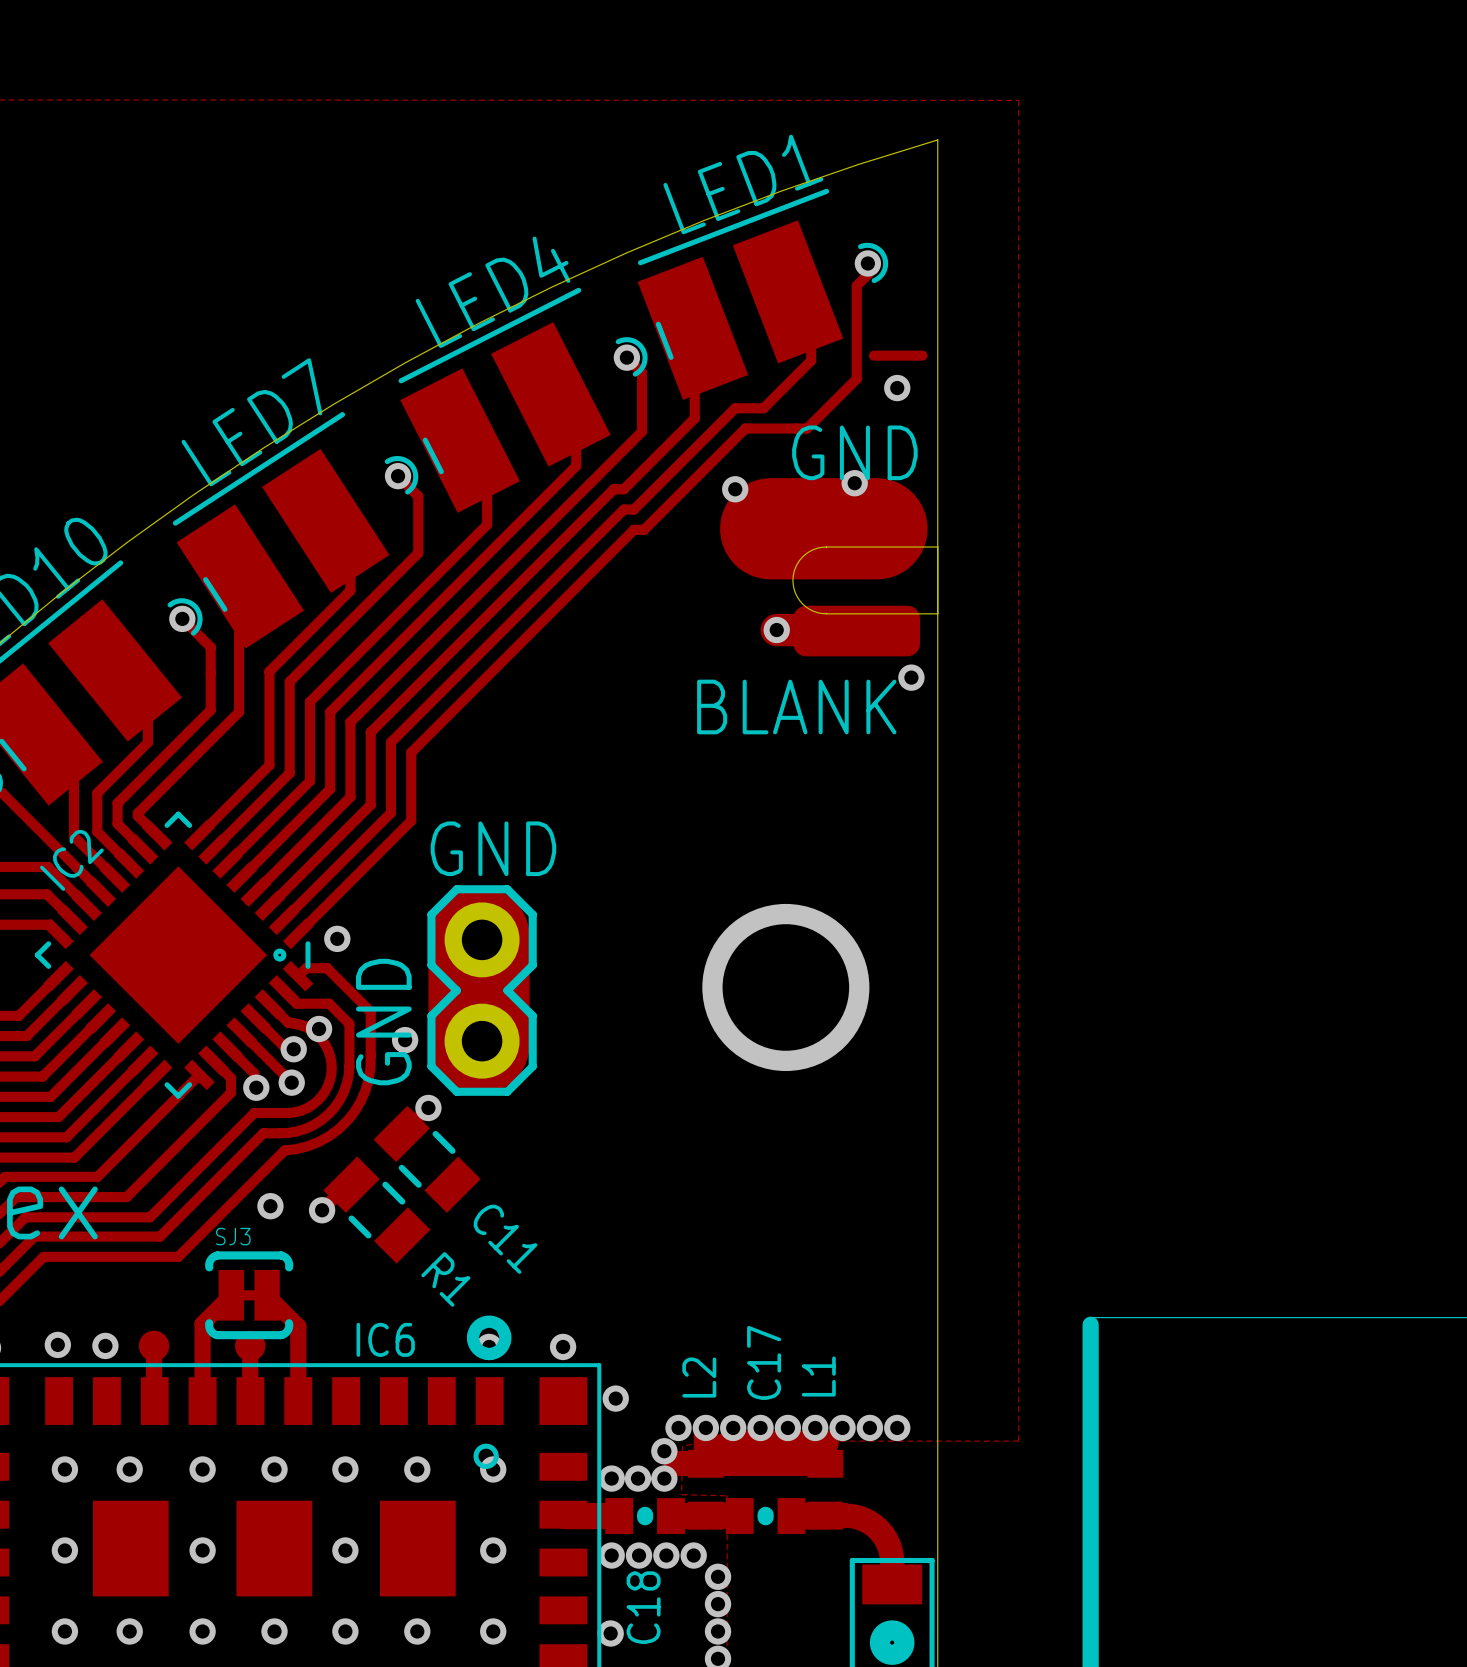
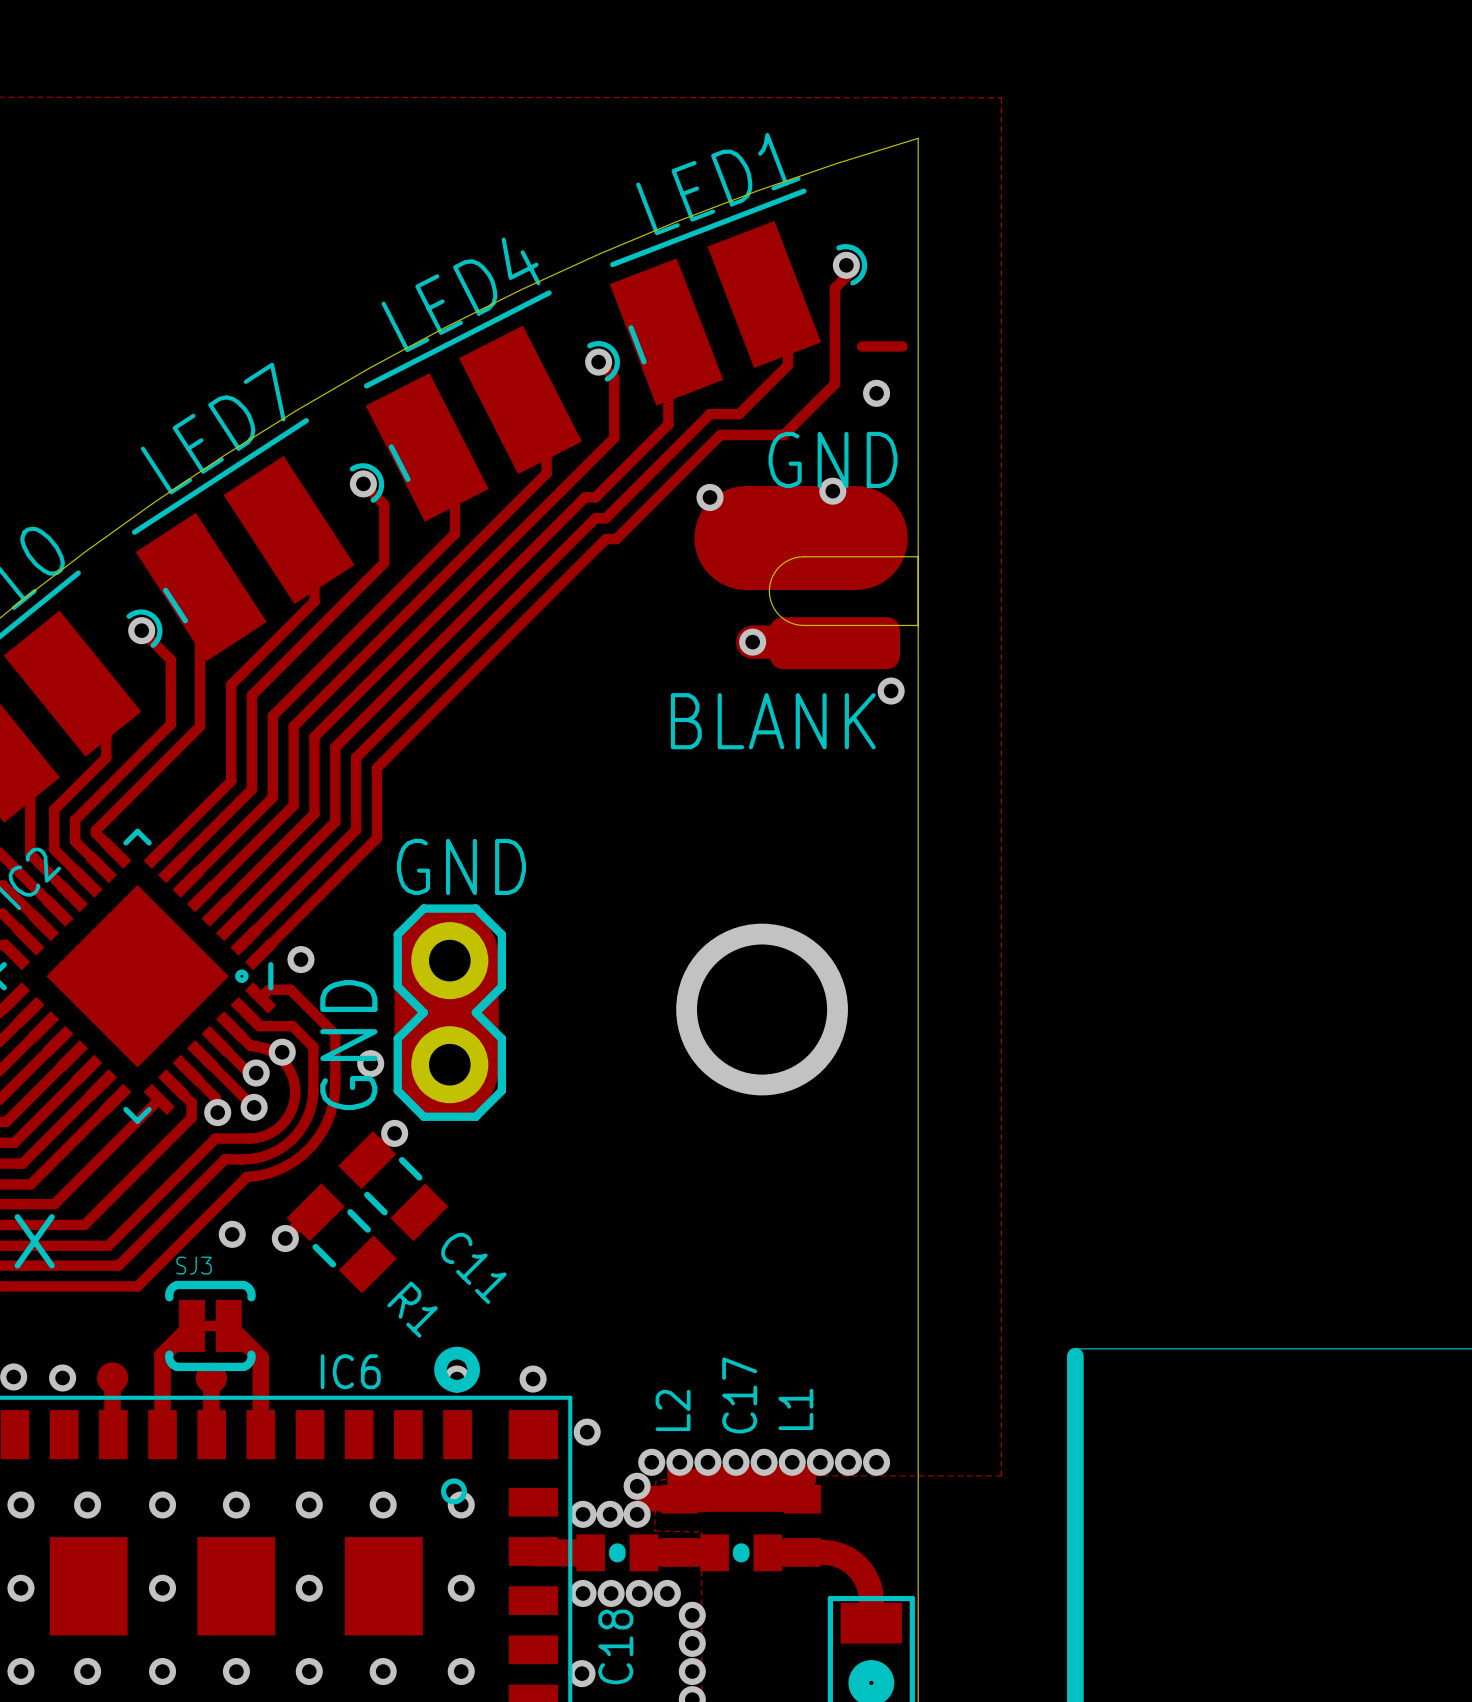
track: none -> (861, 346) (902, 346)
track: (873, 355) (922, 355) -> none

